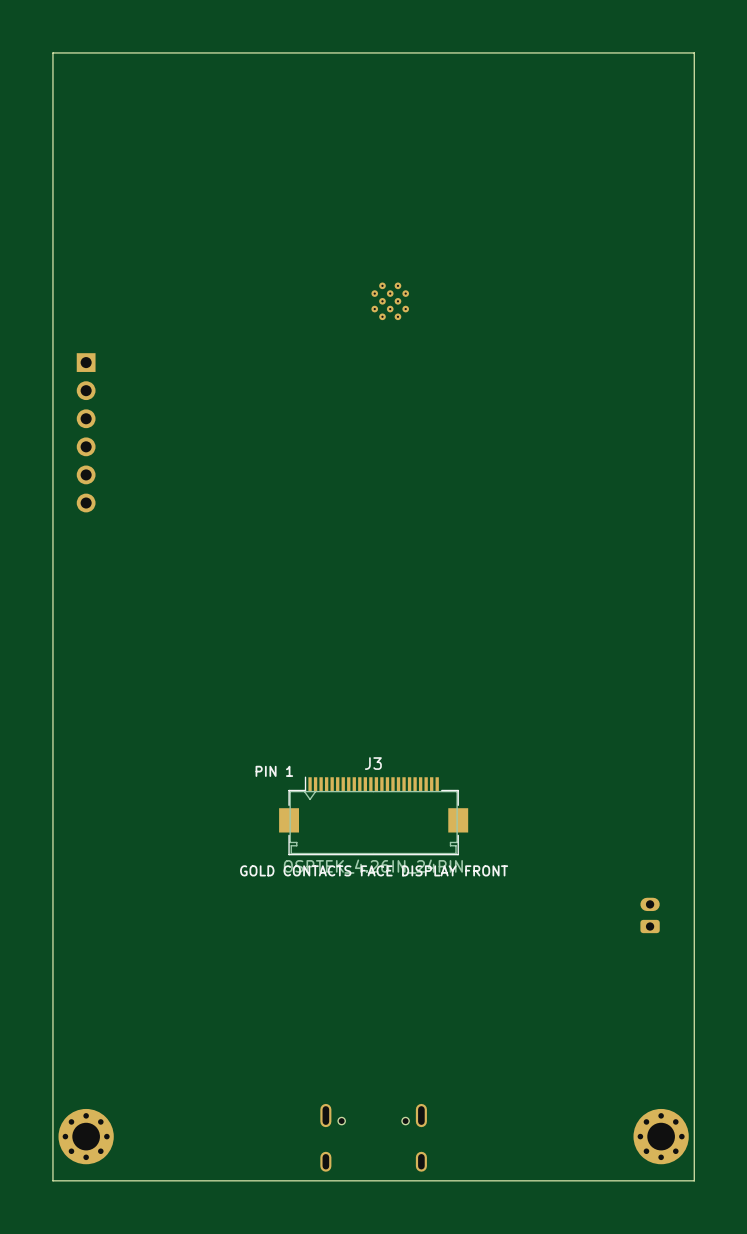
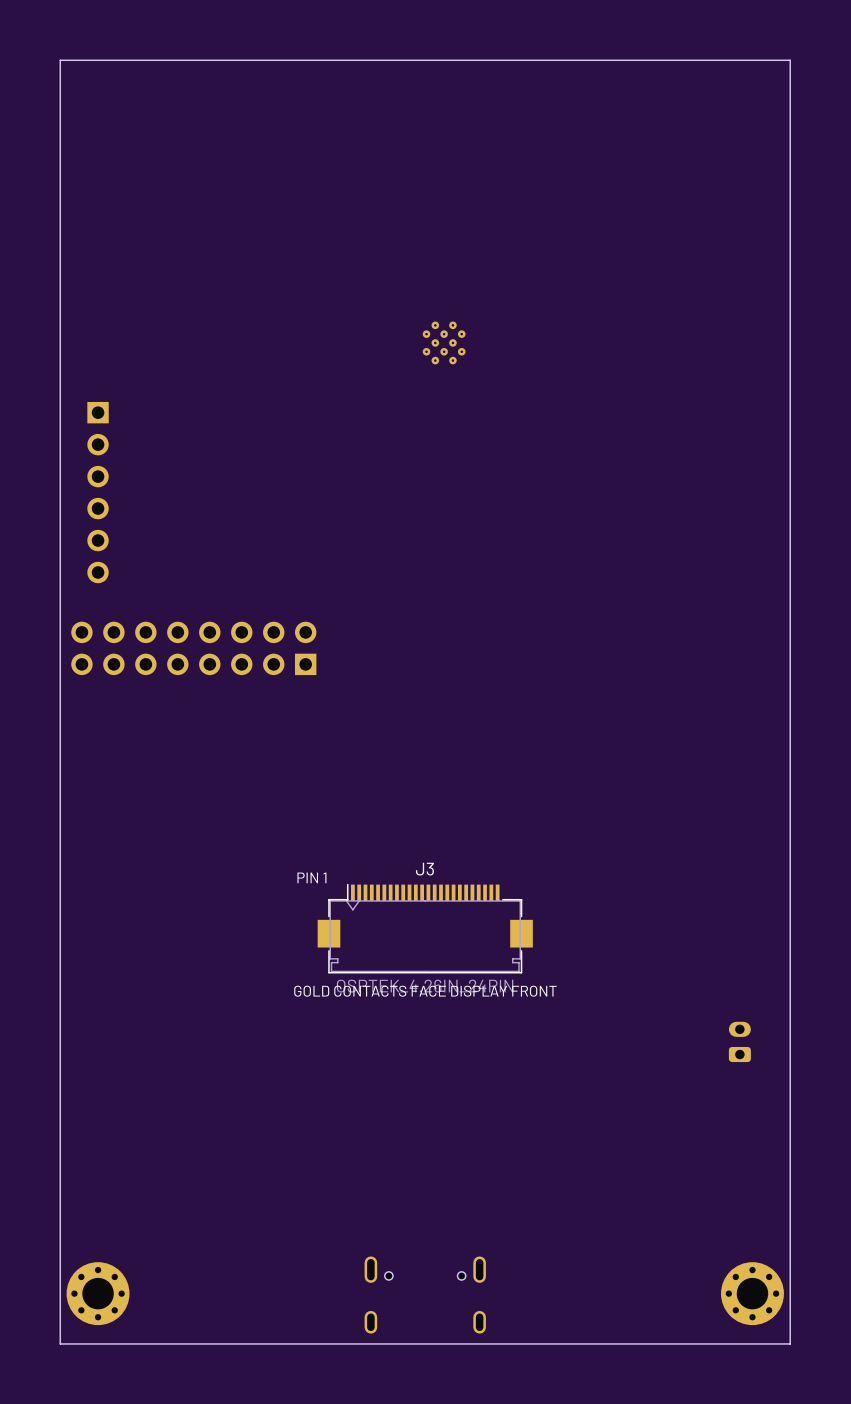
part: none -> (193, 648)

